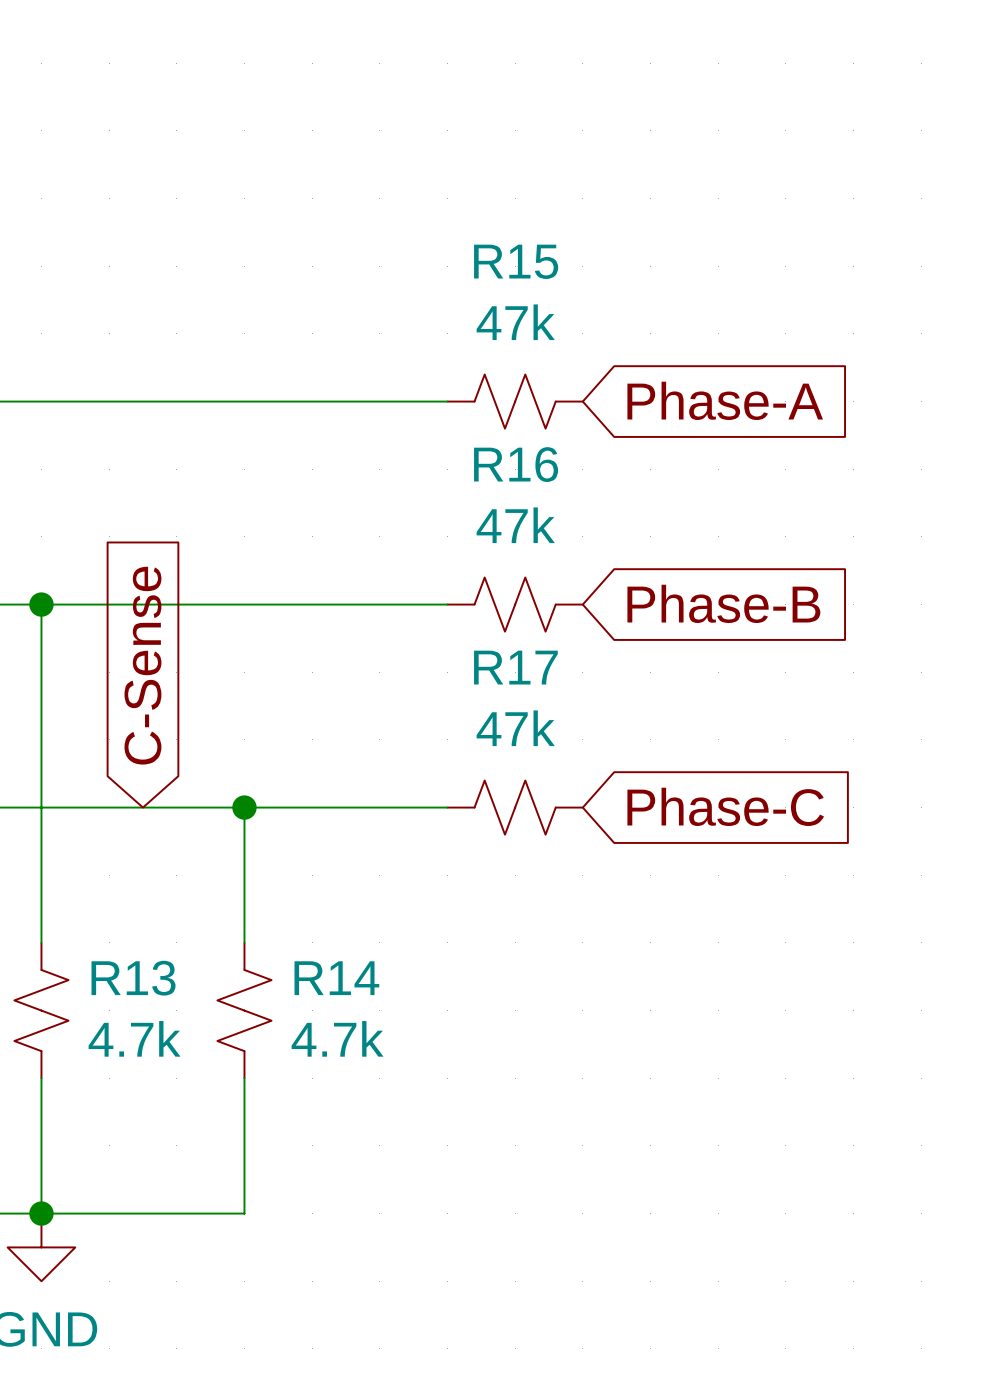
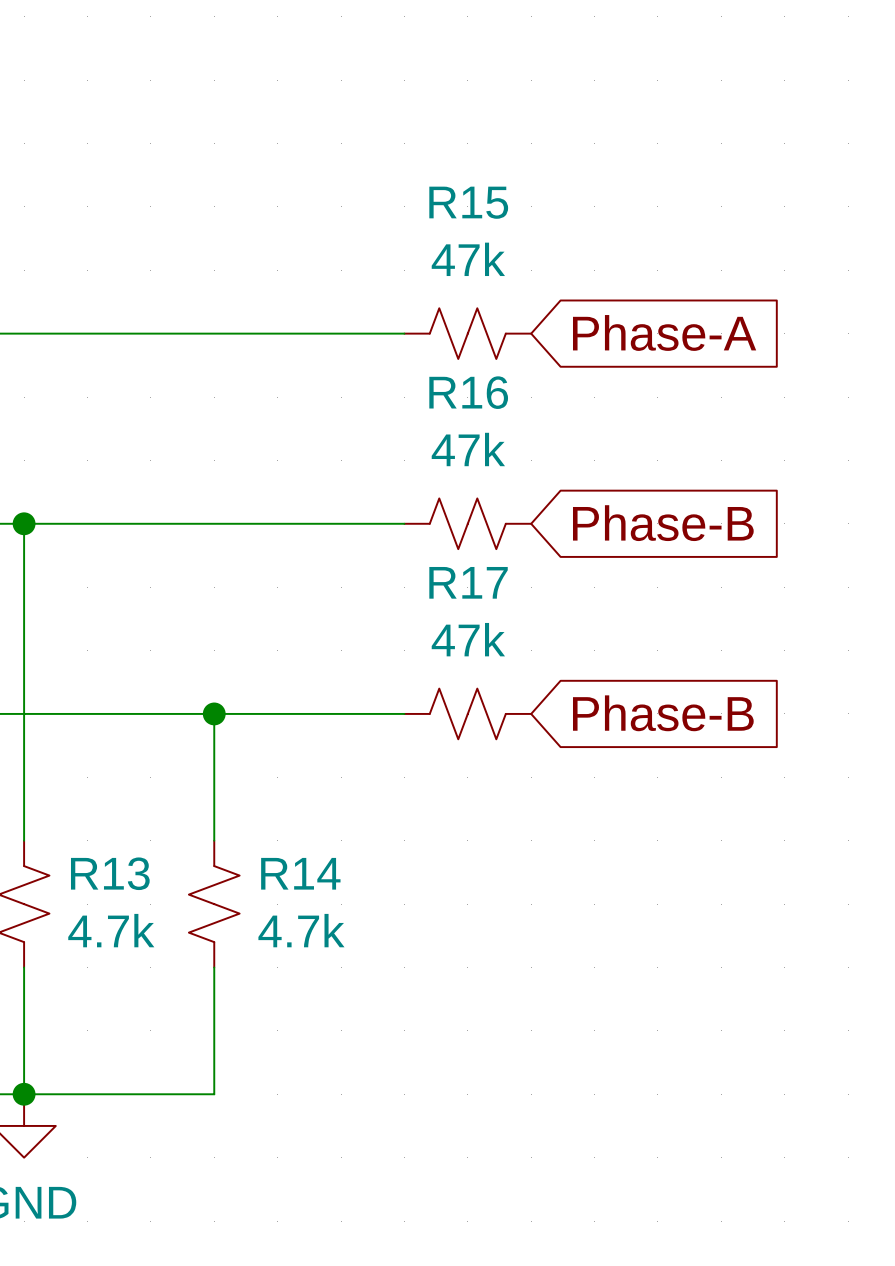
global label: C-Sense (142, 665) -> none
global label: Phase-C (725, 806) -> Phase-B (663, 713)

